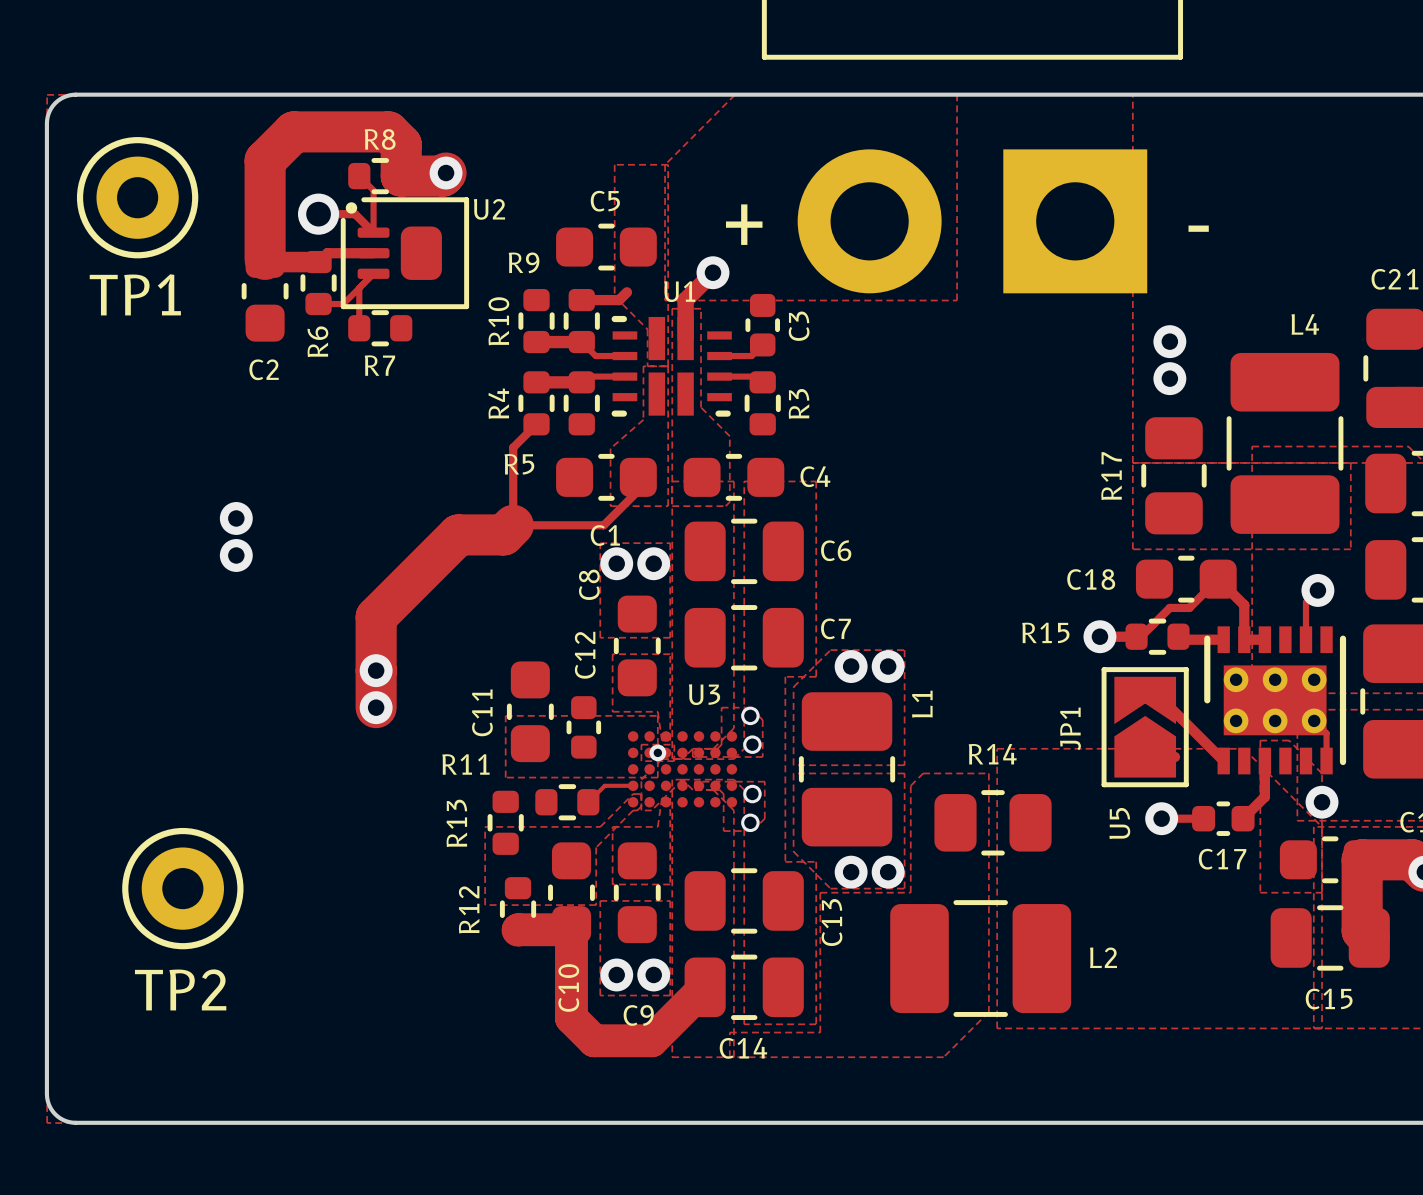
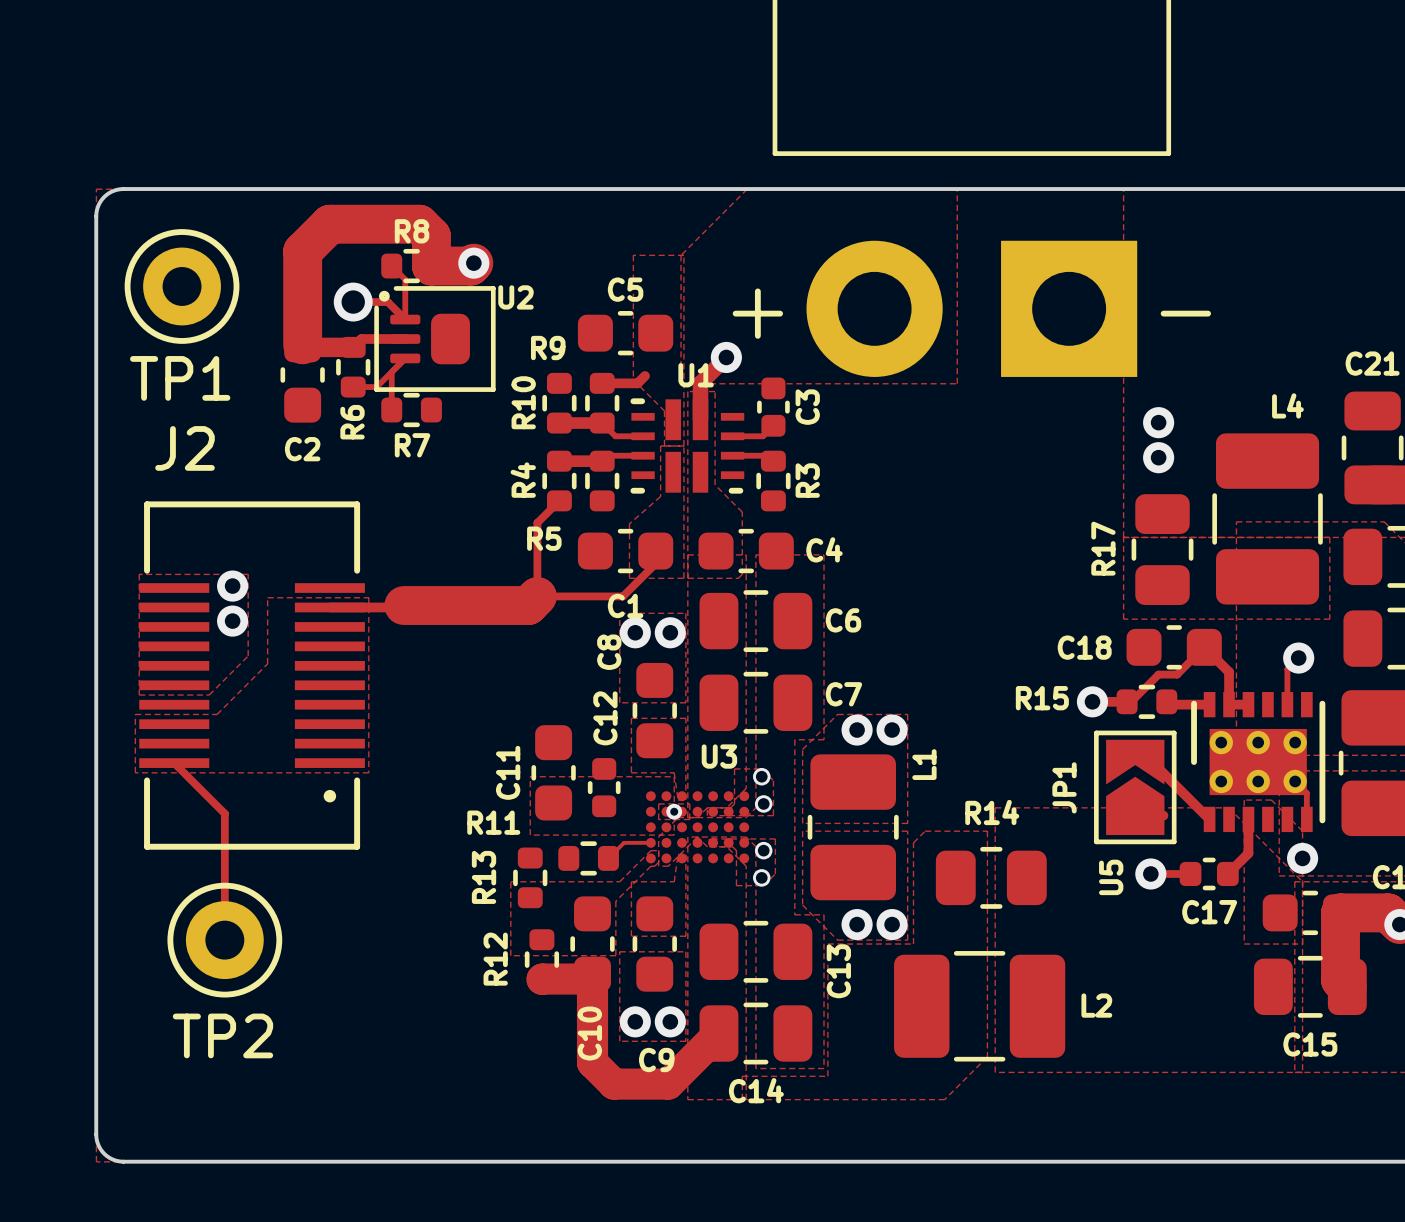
zone outline: none -> (139, 574) (248, 574) (248, 656) (209, 695) (139, 695) (139, 574)
via: none -> (232, 586)
via: (236, 518) -> none
zone outline: none -> (267, 597) (267, 663) (217, 714) (135, 714) (135, 772) (368, 772) (368, 597) (267, 597)
track: (458, 534) (376, 617) (376, 707) -> (485, 605) (329, 607)
via: none -> (232, 621)
via: (236, 555) -> none
J2: none -> (252, 675)
via: (376, 670) -> none
track: none -> (174, 763) (224, 813) (224, 940)
via: (376, 707) -> none

